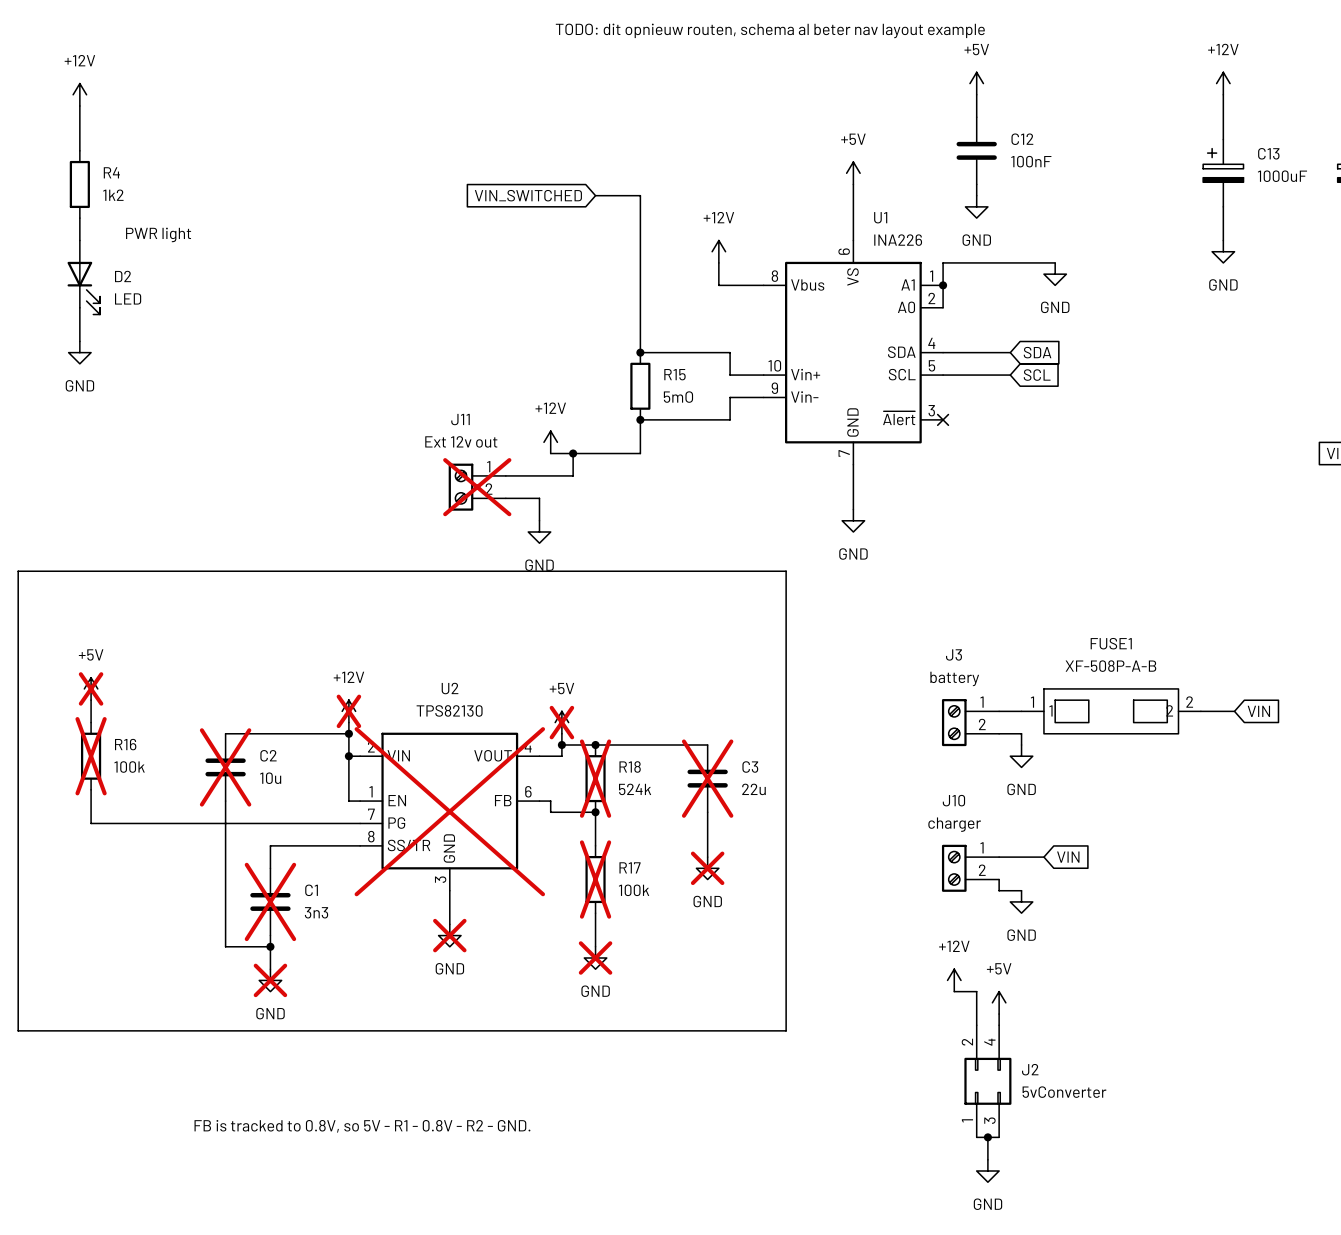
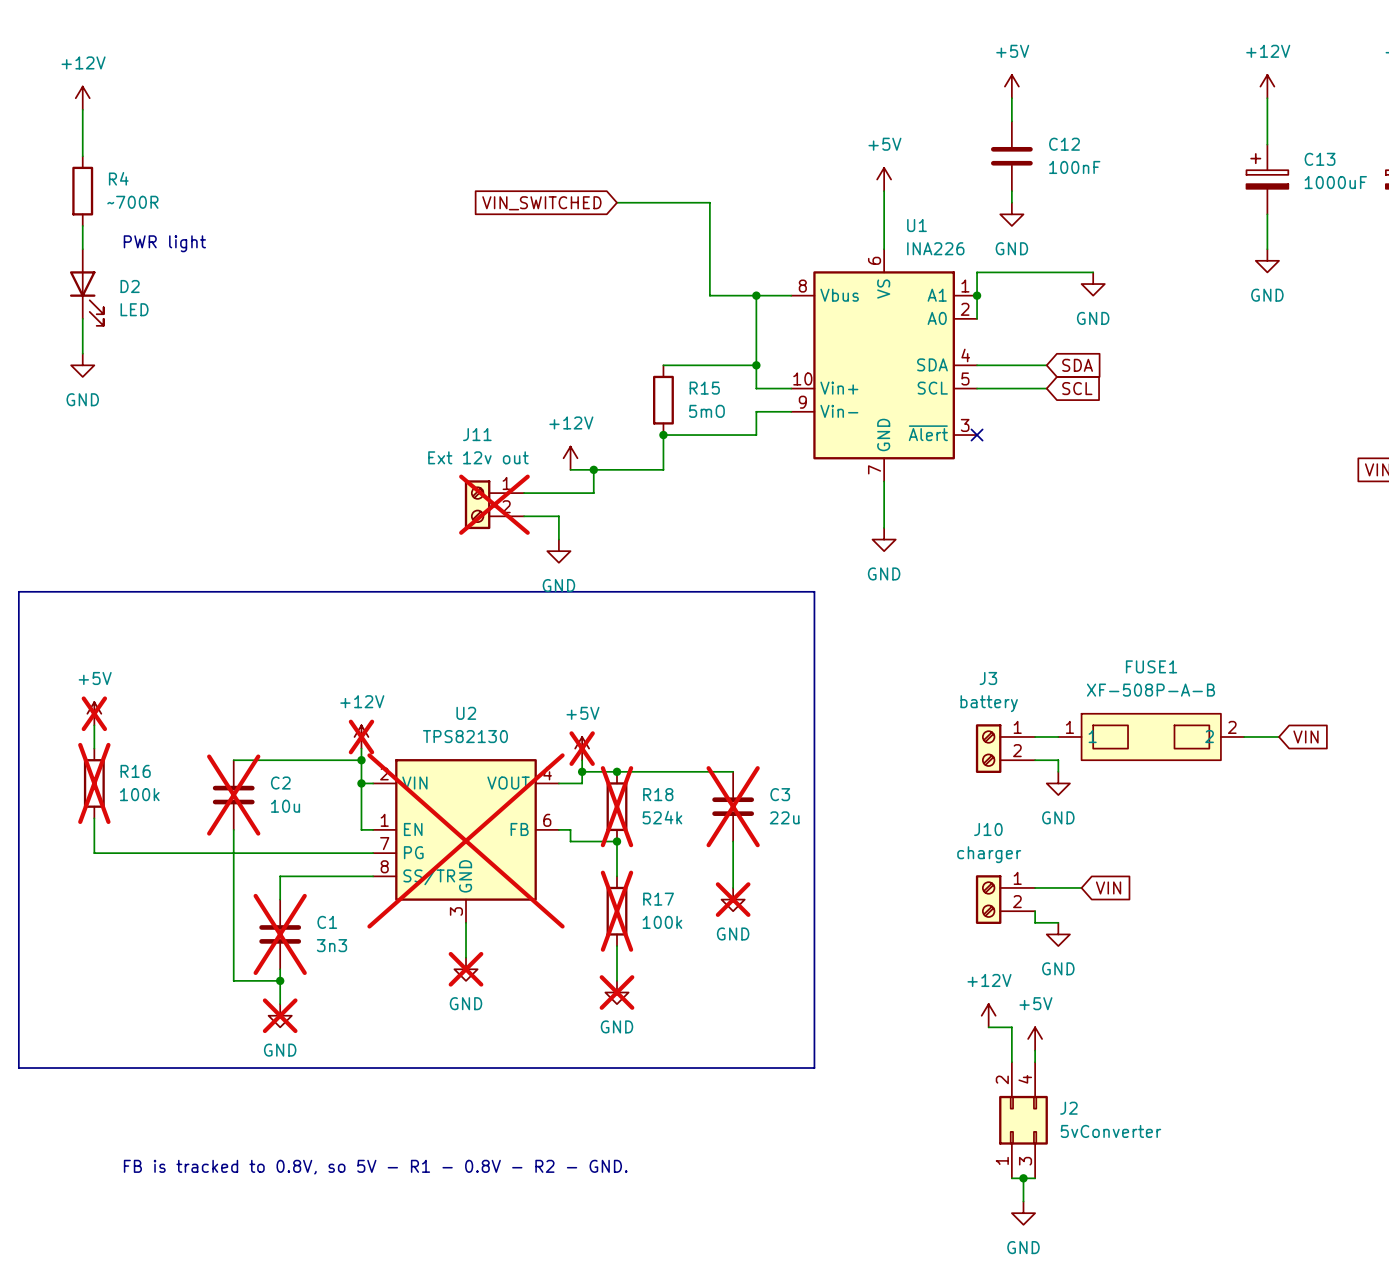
text: TODO: dit opnieuw routen, schema al beter nav layout example (770, 30) -> none
R4 value: 1k2 (113, 195) -> ~700R (132, 202)
wire: (640, 195) (640, 352) -> (663, 202) (709, 202) (709, 295) (744, 295)
power symbol: +12V (718, 251) -> none
wire: (718, 262) (718, 285) -> none
wire: none -> (756, 295) (756, 365)
junction: none -> (756, 295)
junction: (640, 352) -> none
junction: none -> (756, 365)

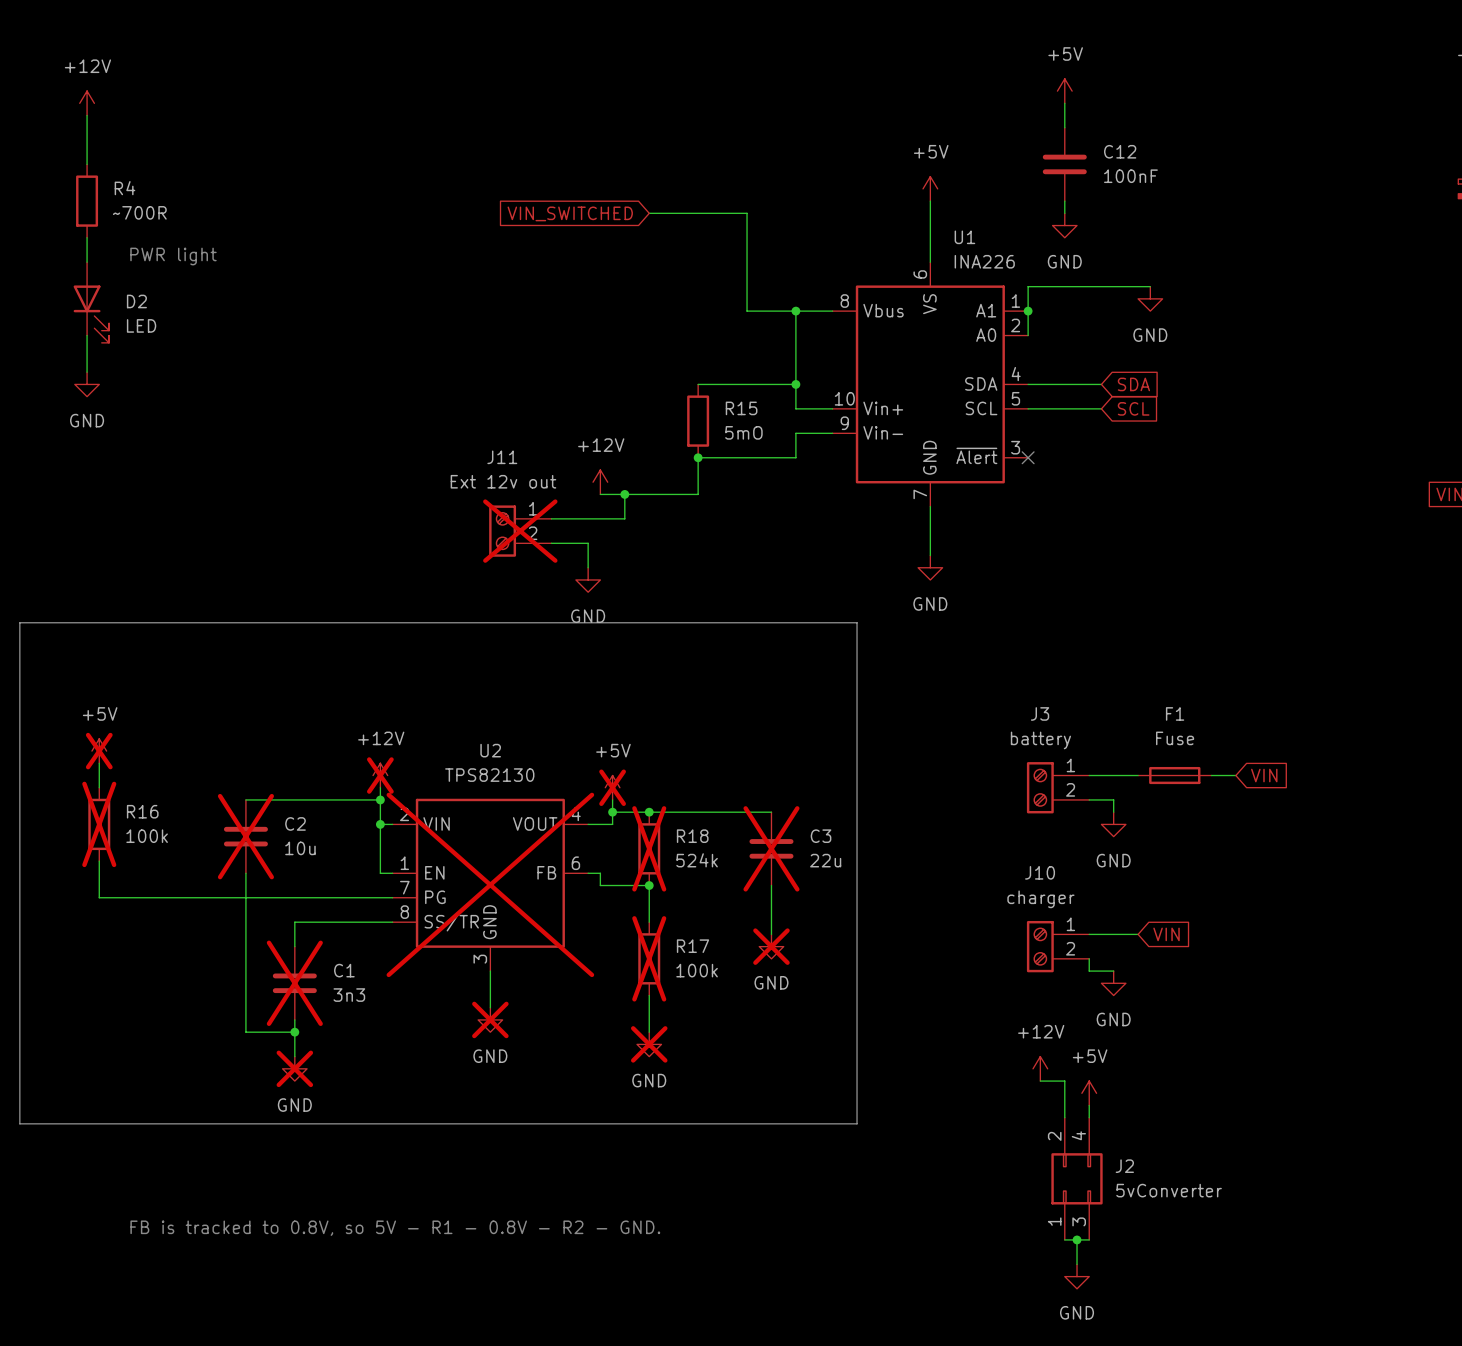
power symbol: +12V (1267, 86) -> none
wire: (1267, 98) (1267, 144) -> none
C13: 1000uF (1267, 179) -> none
wire: (1267, 214) (1267, 249) -> none
power symbol: GND (1267, 260) -> none
F1: none -> Fuse (1174, 775)
FUSE1: XF-508P-A-B (1151, 736) -> none
wire: (1244, 736) (1279, 736) -> none
global label position: VIN (1305, 736) -> VIN (1264, 775)

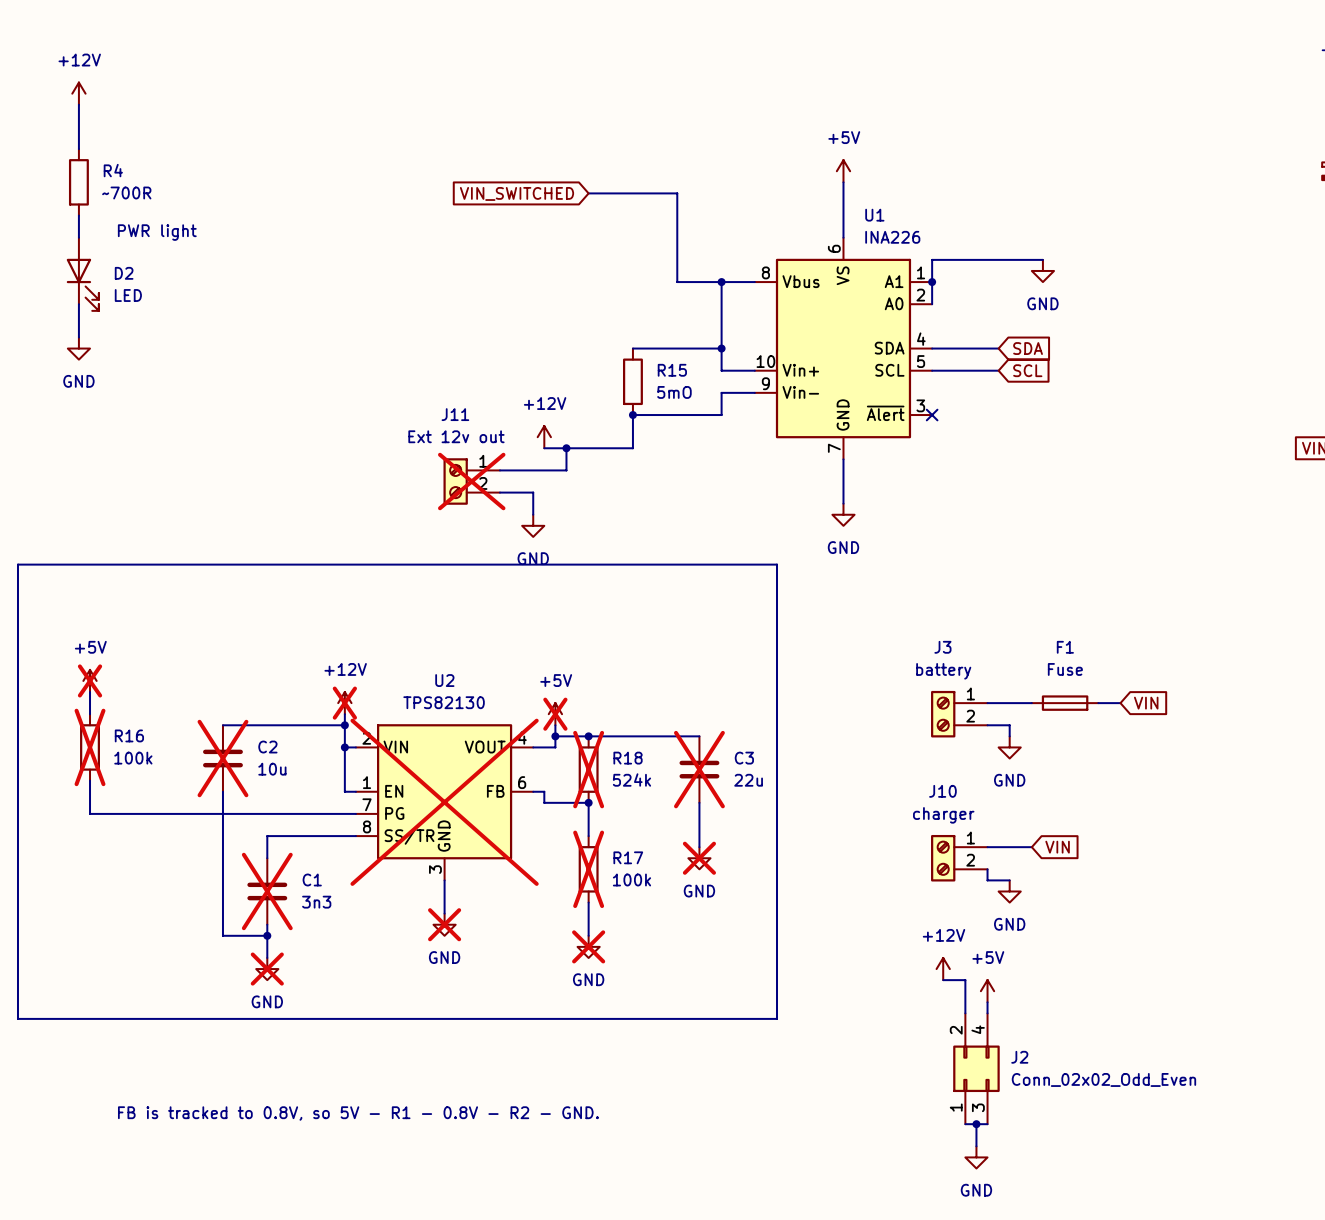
power symbol: +5V (1064, 91) -> none
wire: (1064, 103) (1064, 127) -> none
C12: 100nF (1064, 164) -> none
wire: (1064, 201) (1064, 213) -> none
power symbol: GND (1064, 225) -> none
J2 value: 5vConverter (1169, 1190) -> Conn_02x02_Odd_Even (1103, 1079)

